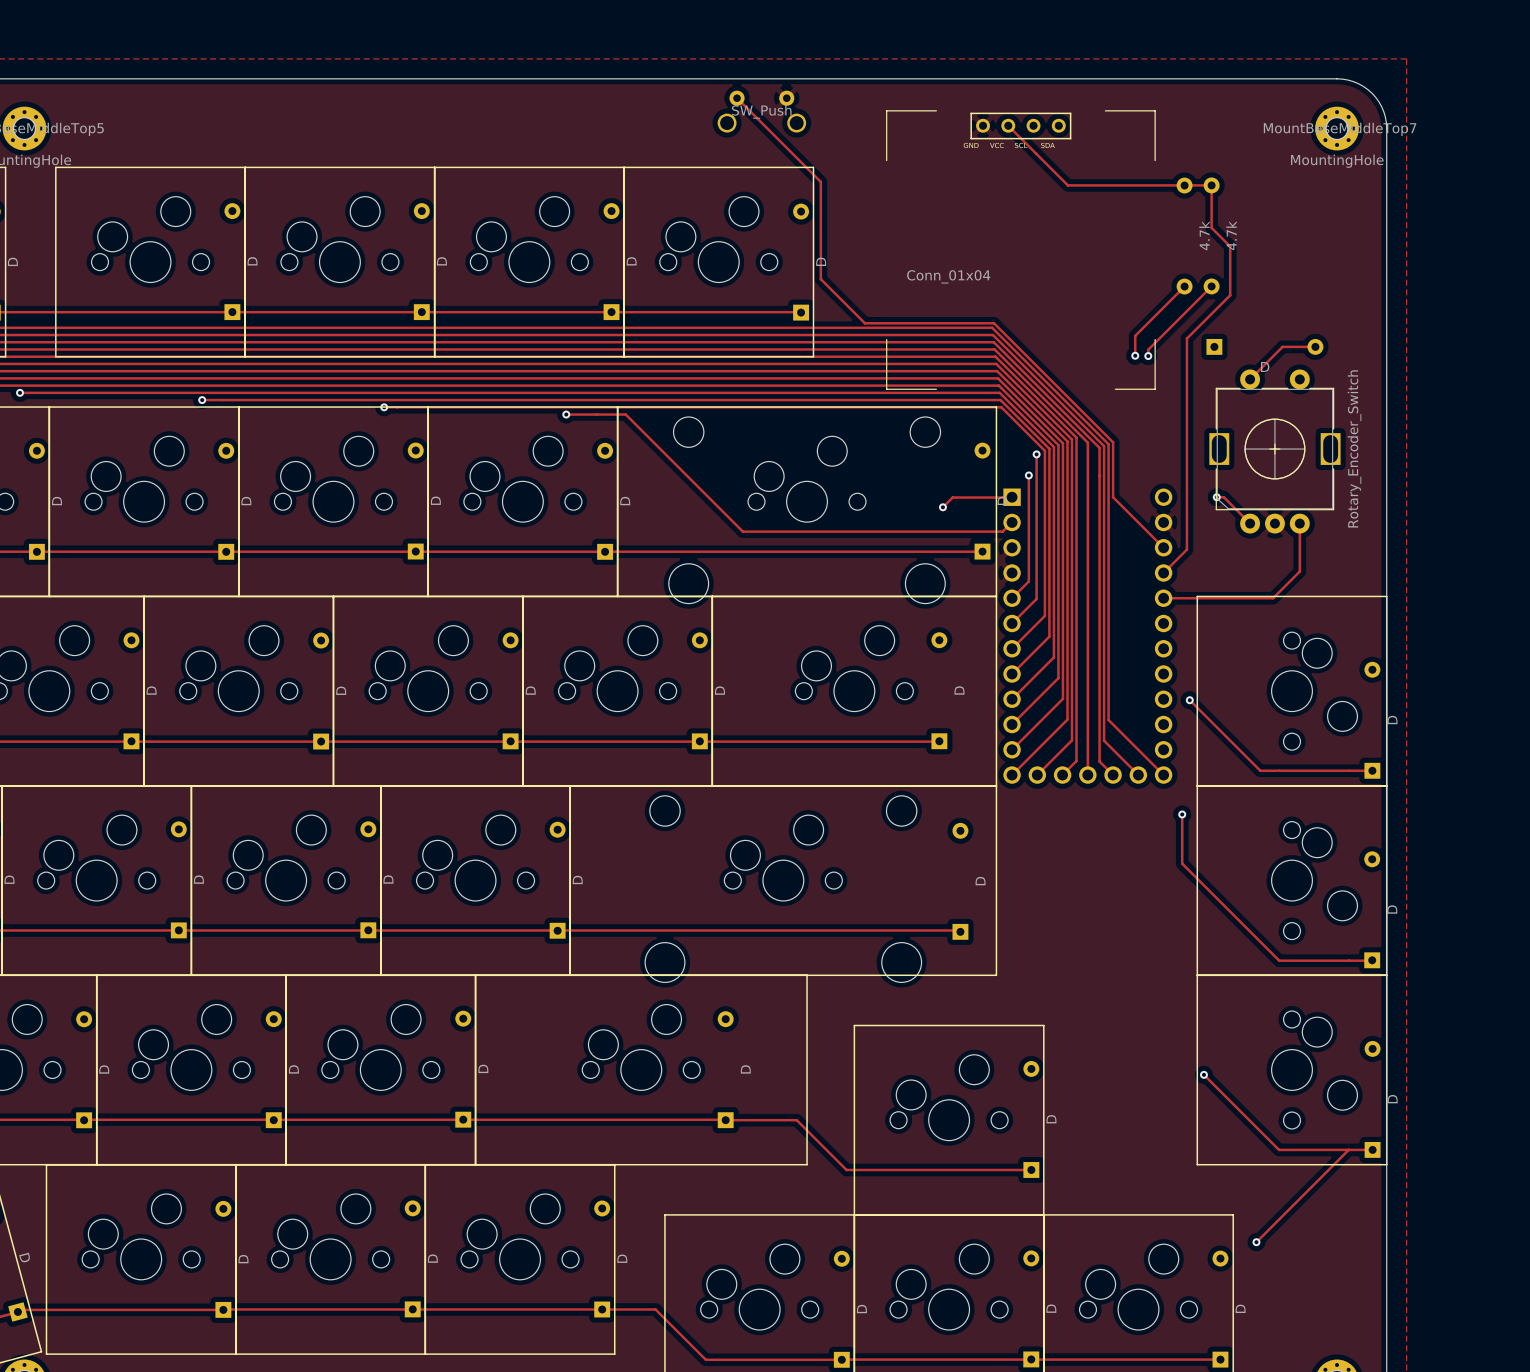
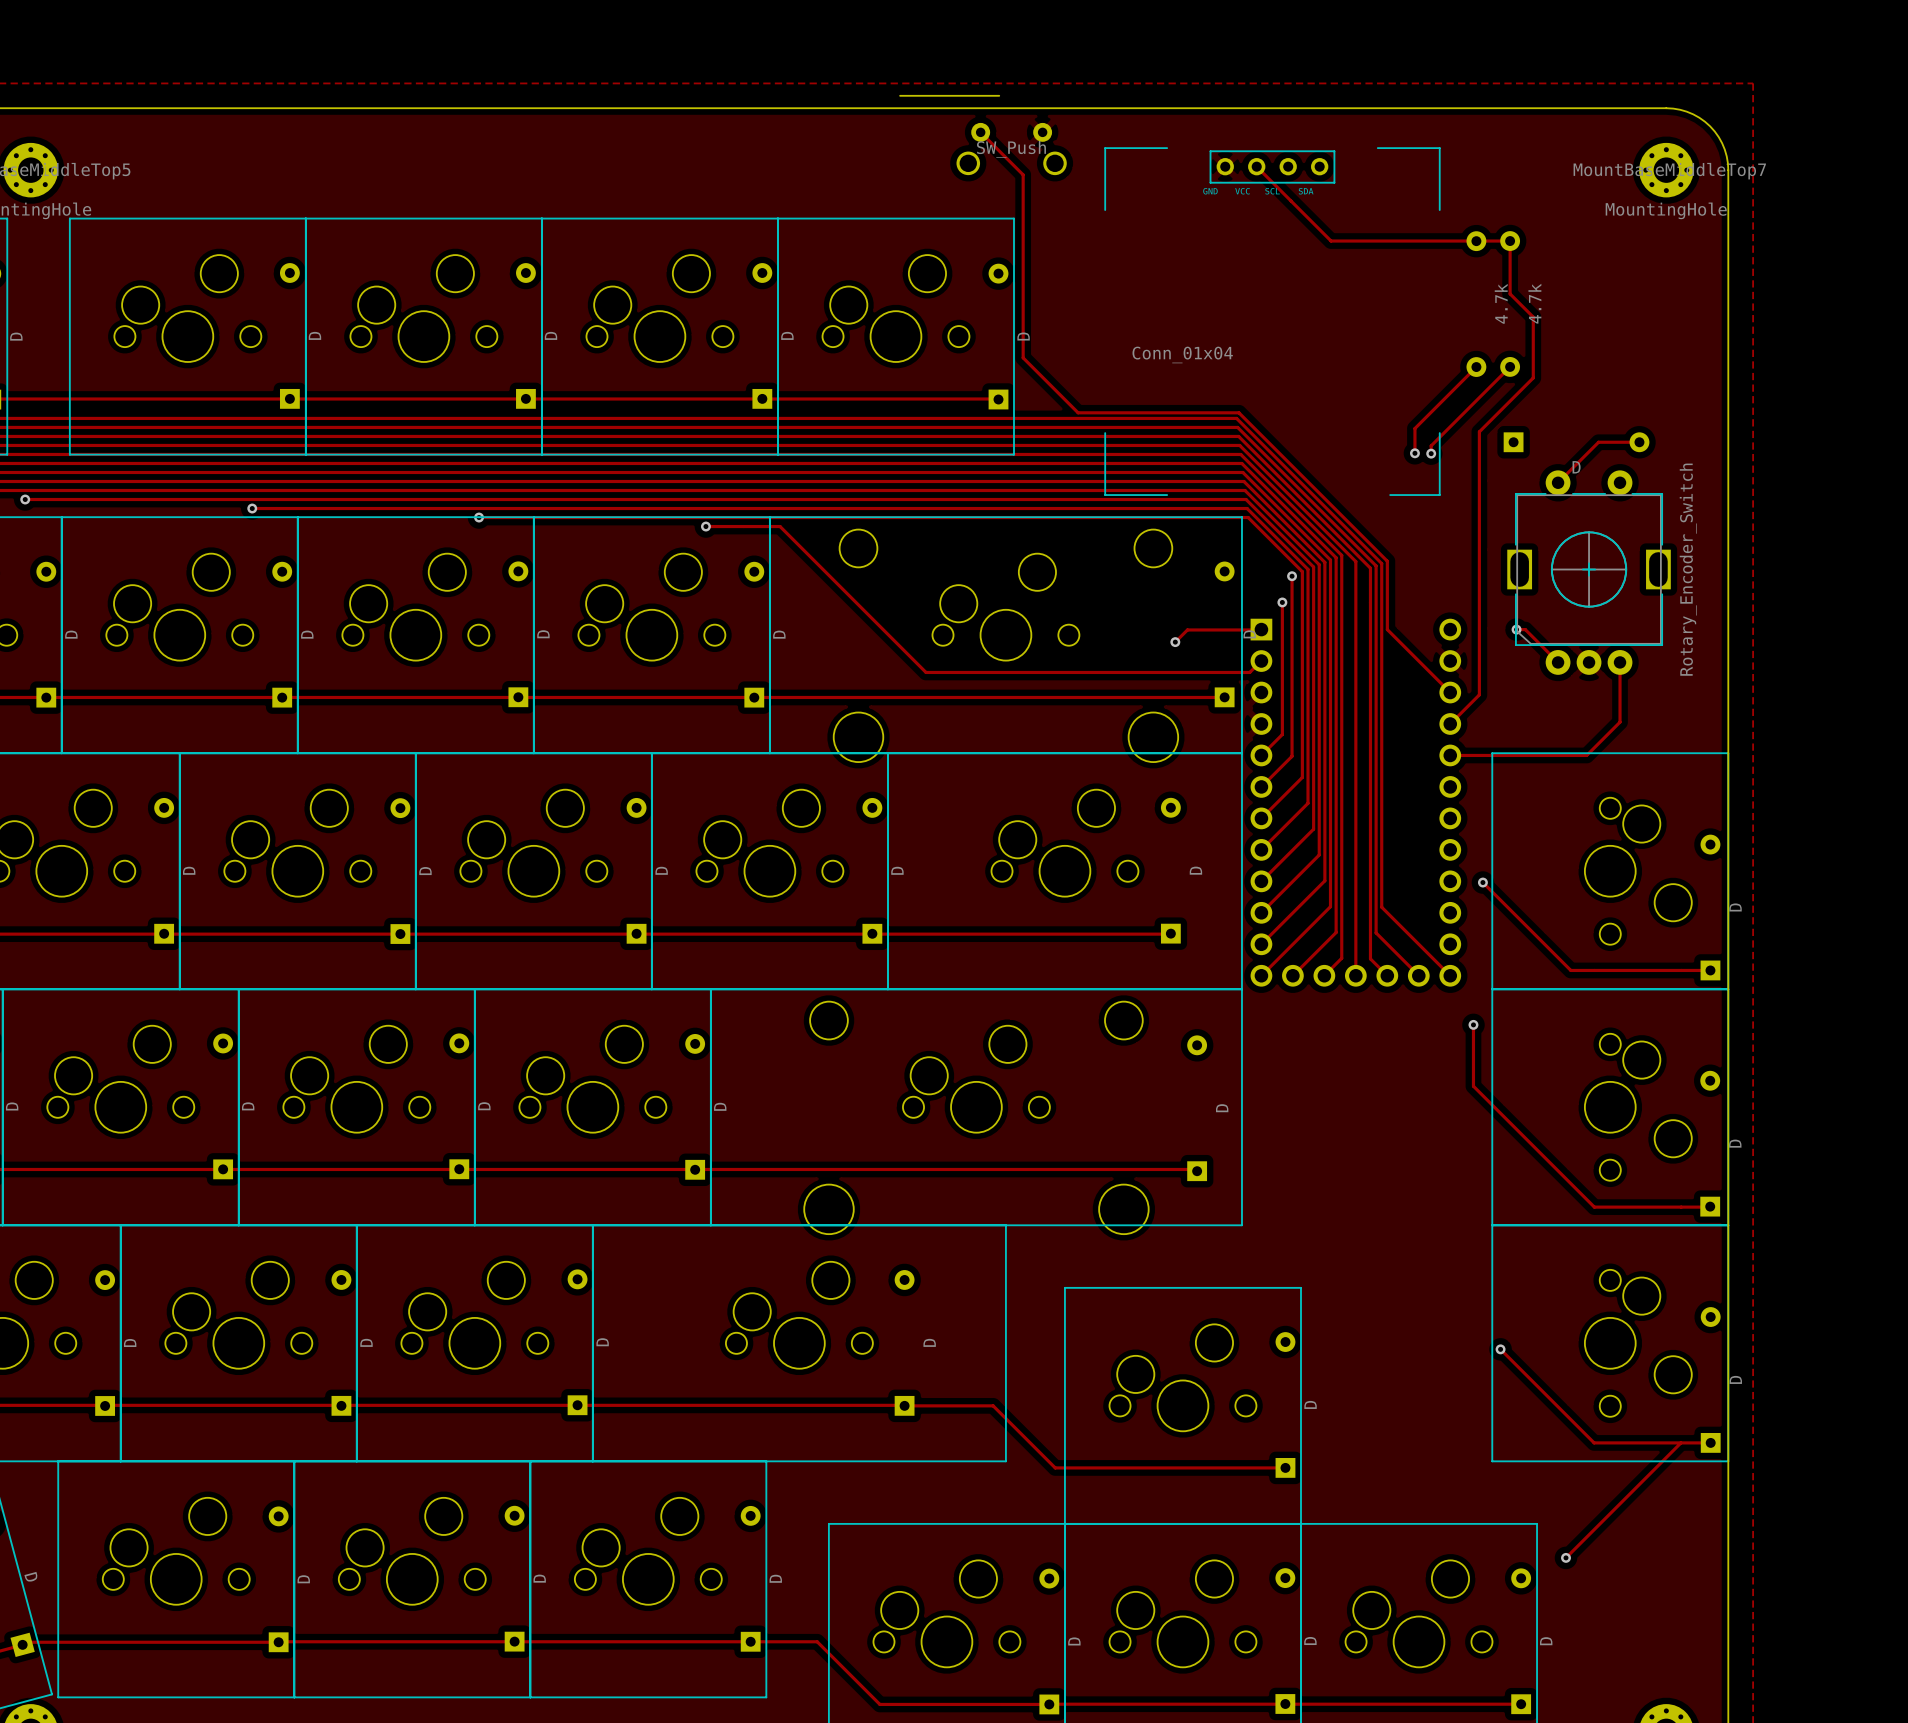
board edge: none -> (900, 95) (999, 95)
track: (737, 98) (820, 181) -> (980, 132) (1023, 174) (1023, 236)
part position: (761, 111) -> (1011, 149)

